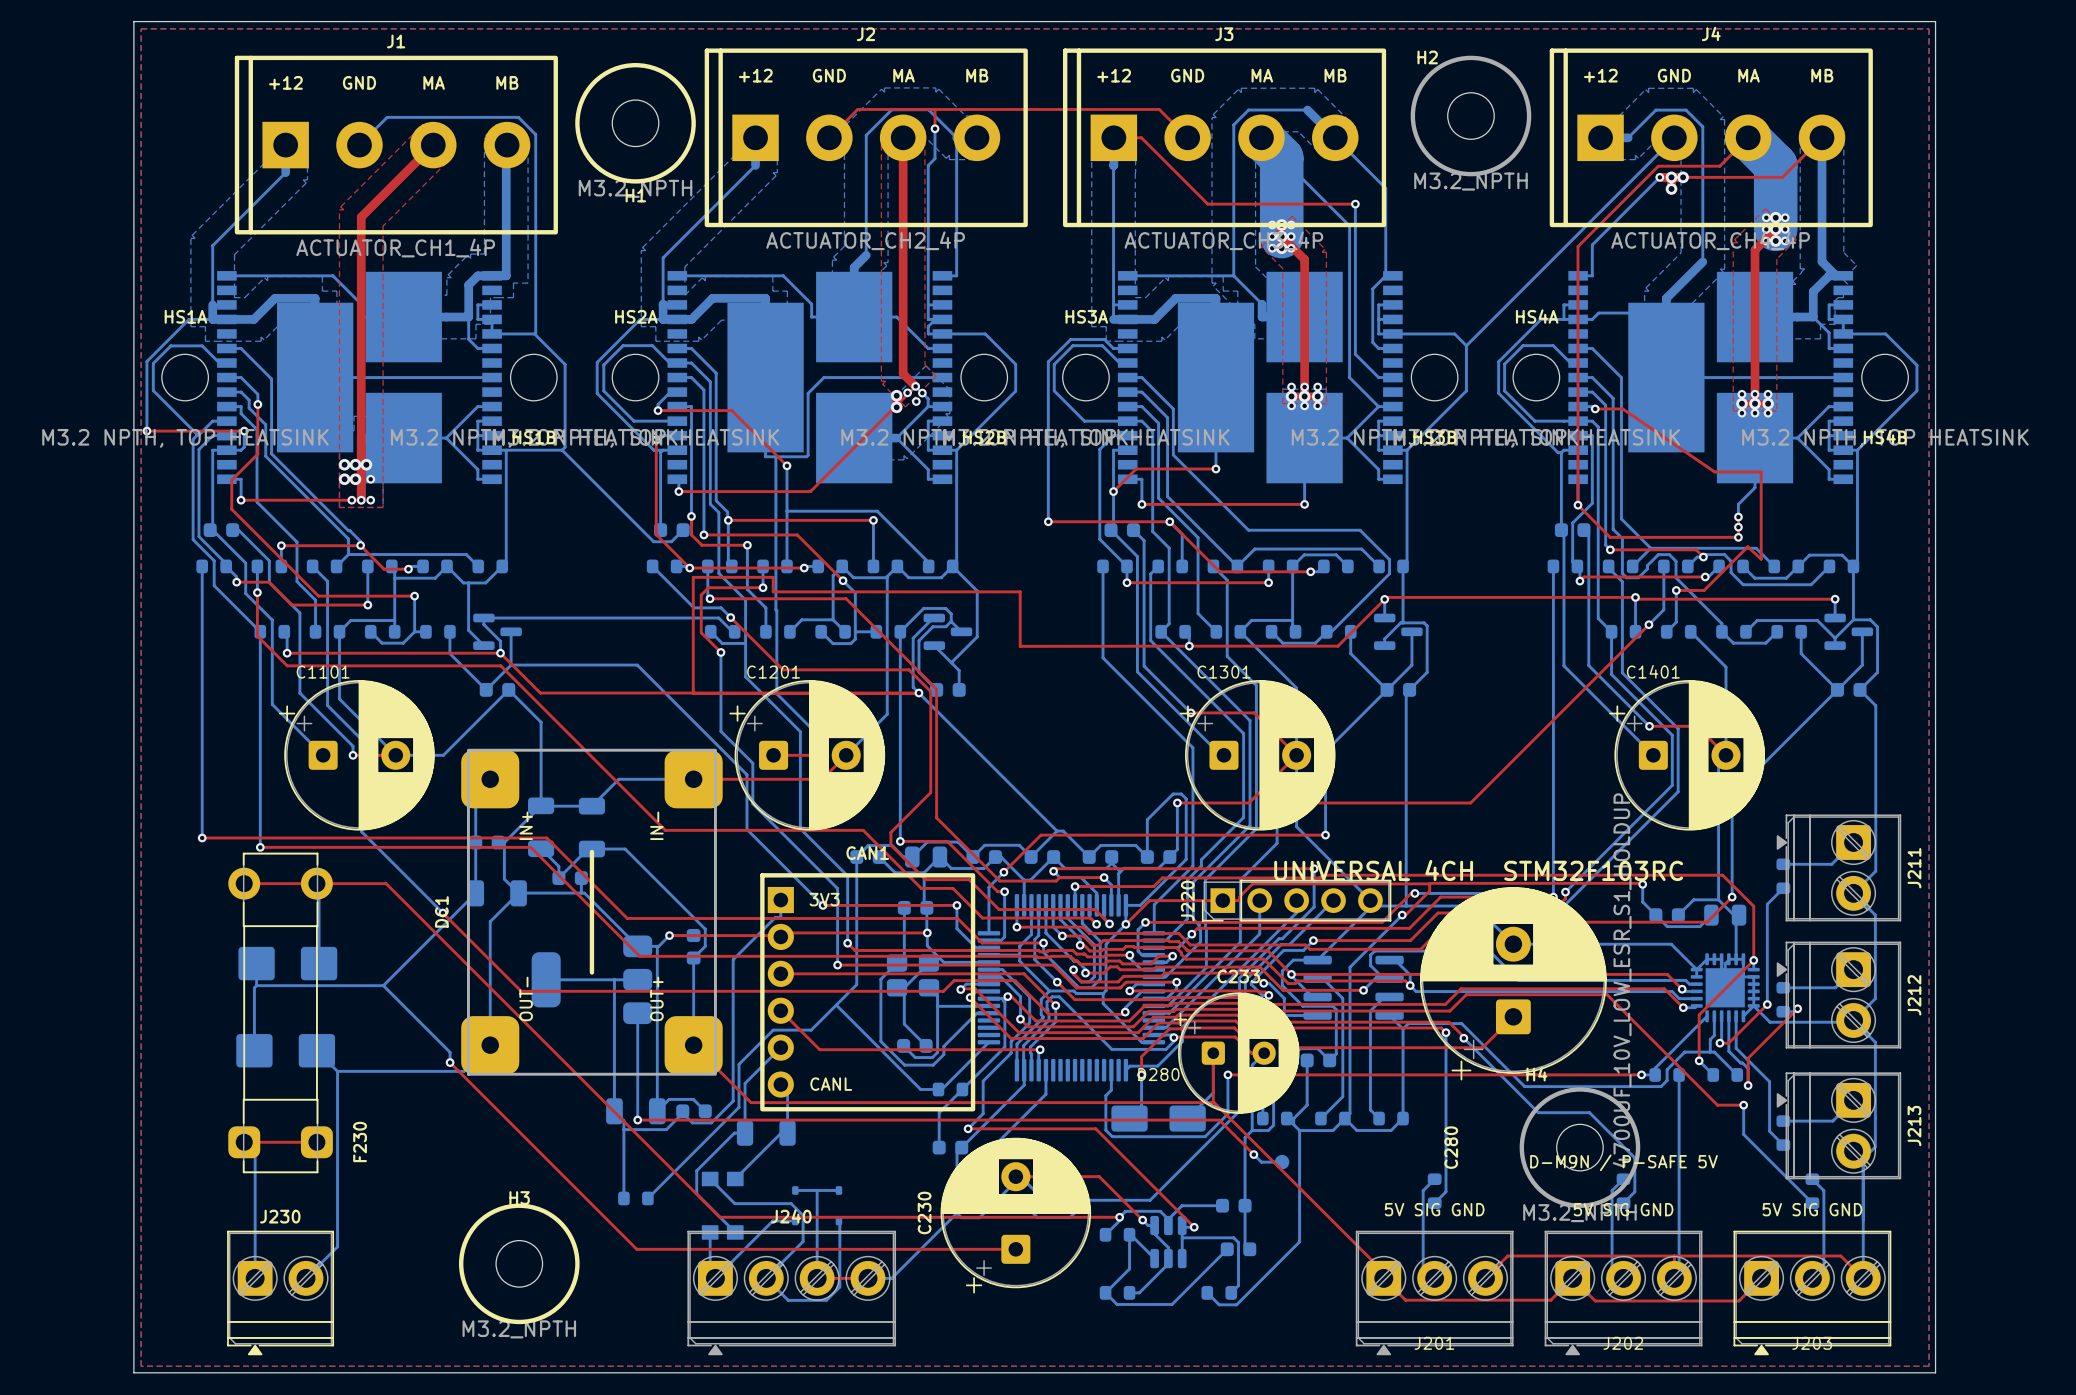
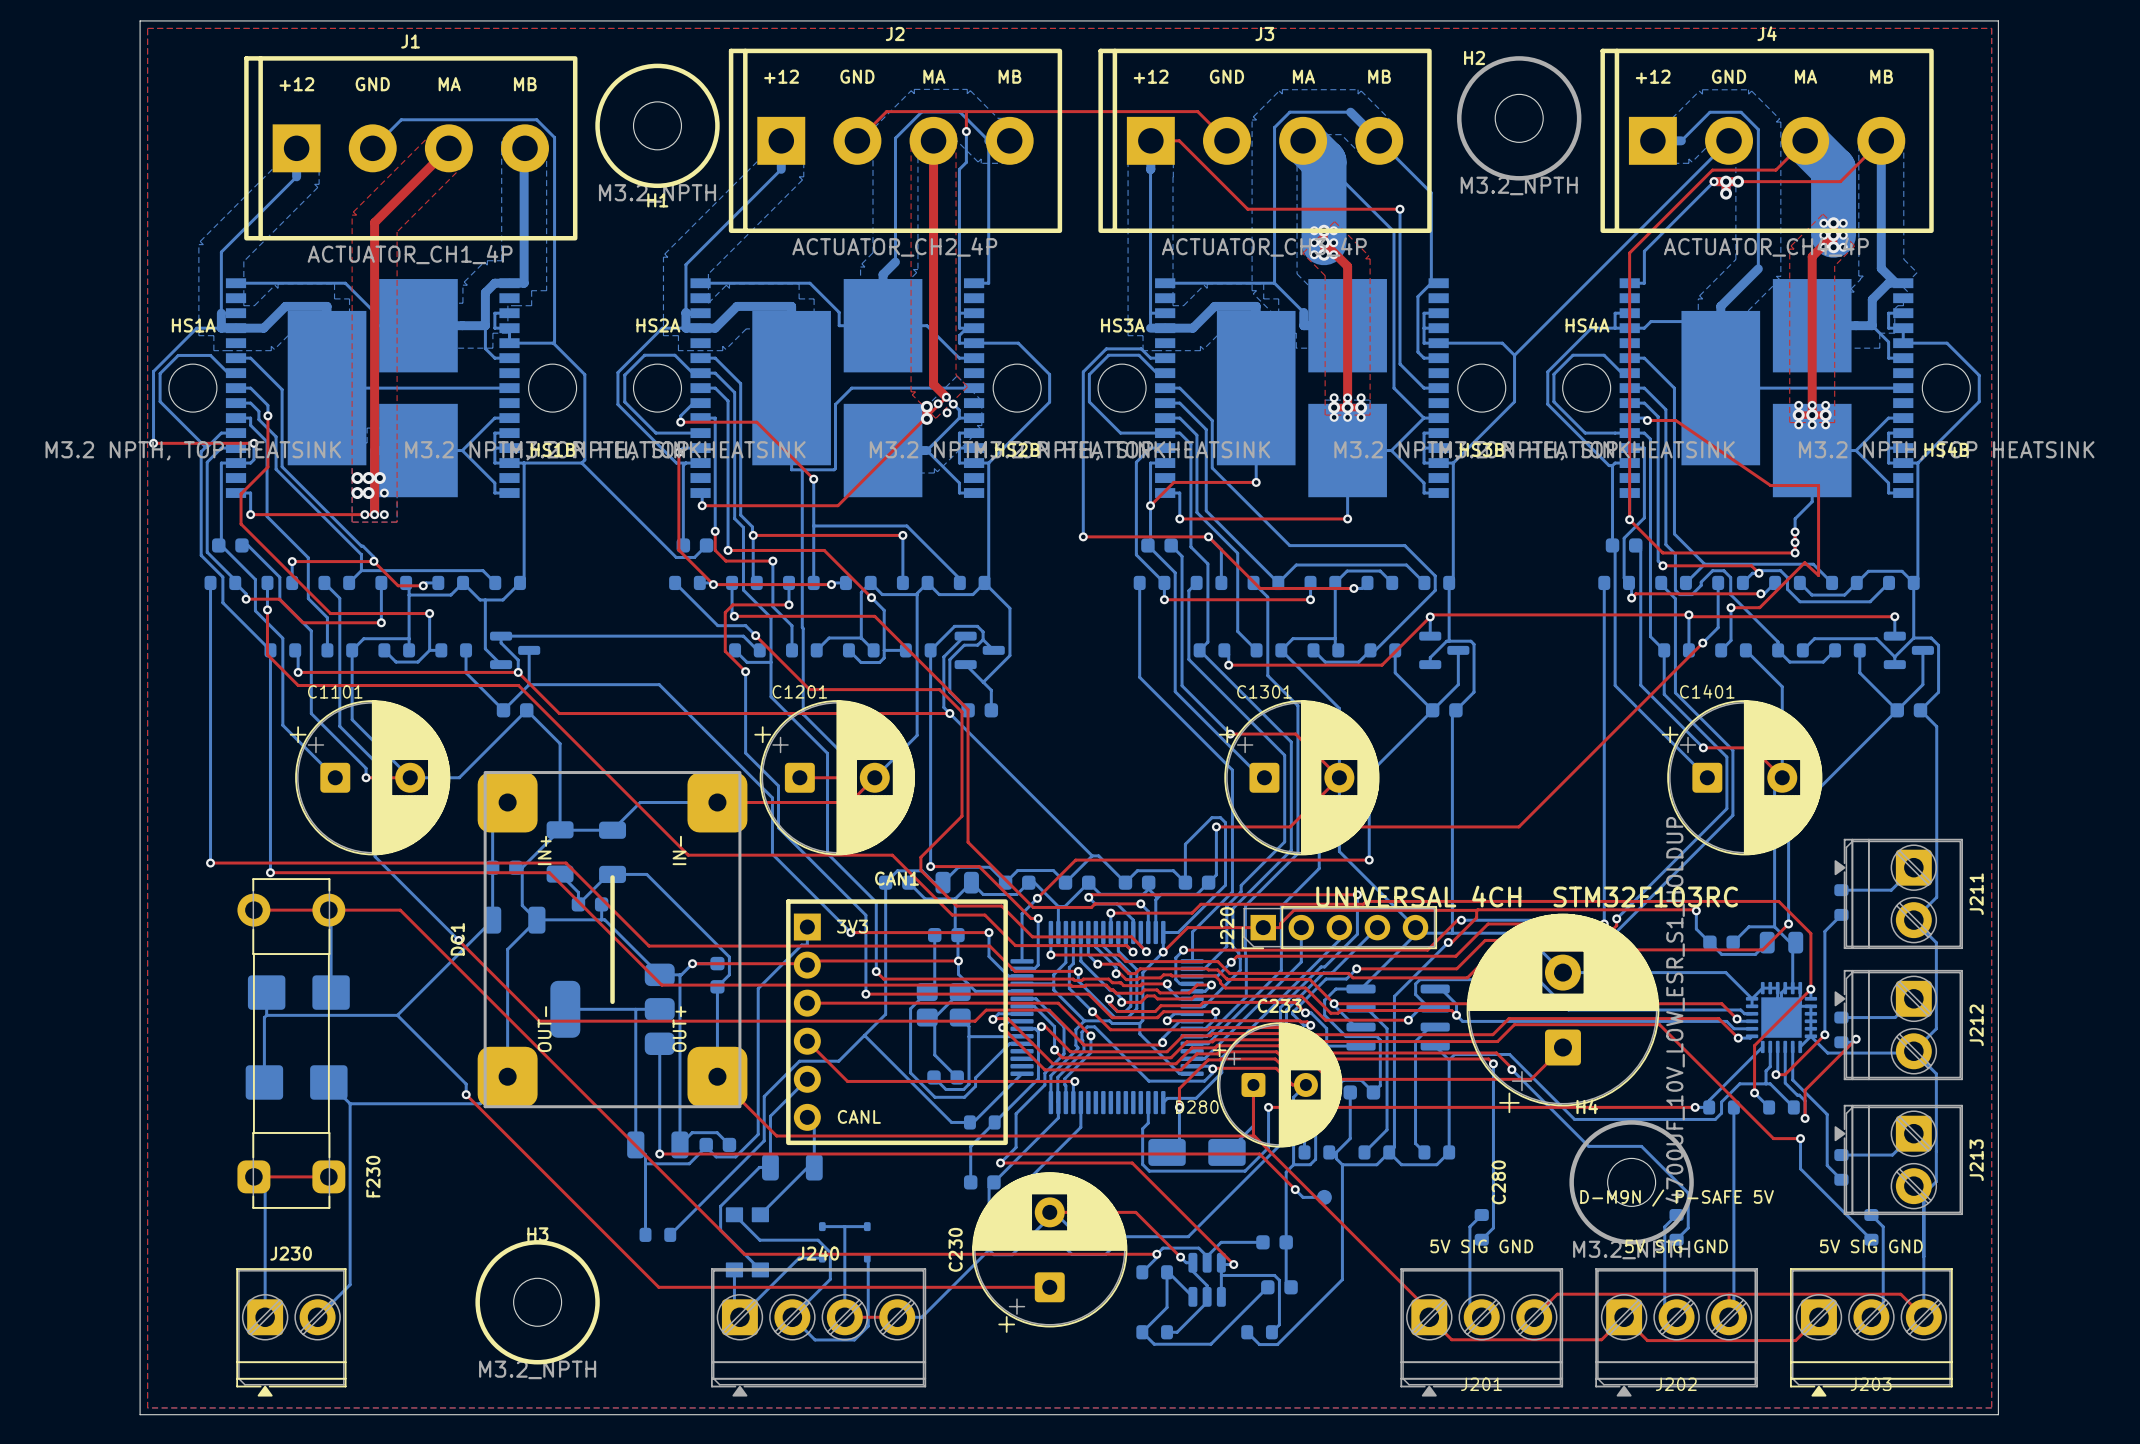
top track: (1189, 646) (1020, 646) (1020, 591) (773, 591) (773, 577) (693, 577) (693, 693) (918, 693) -> none

